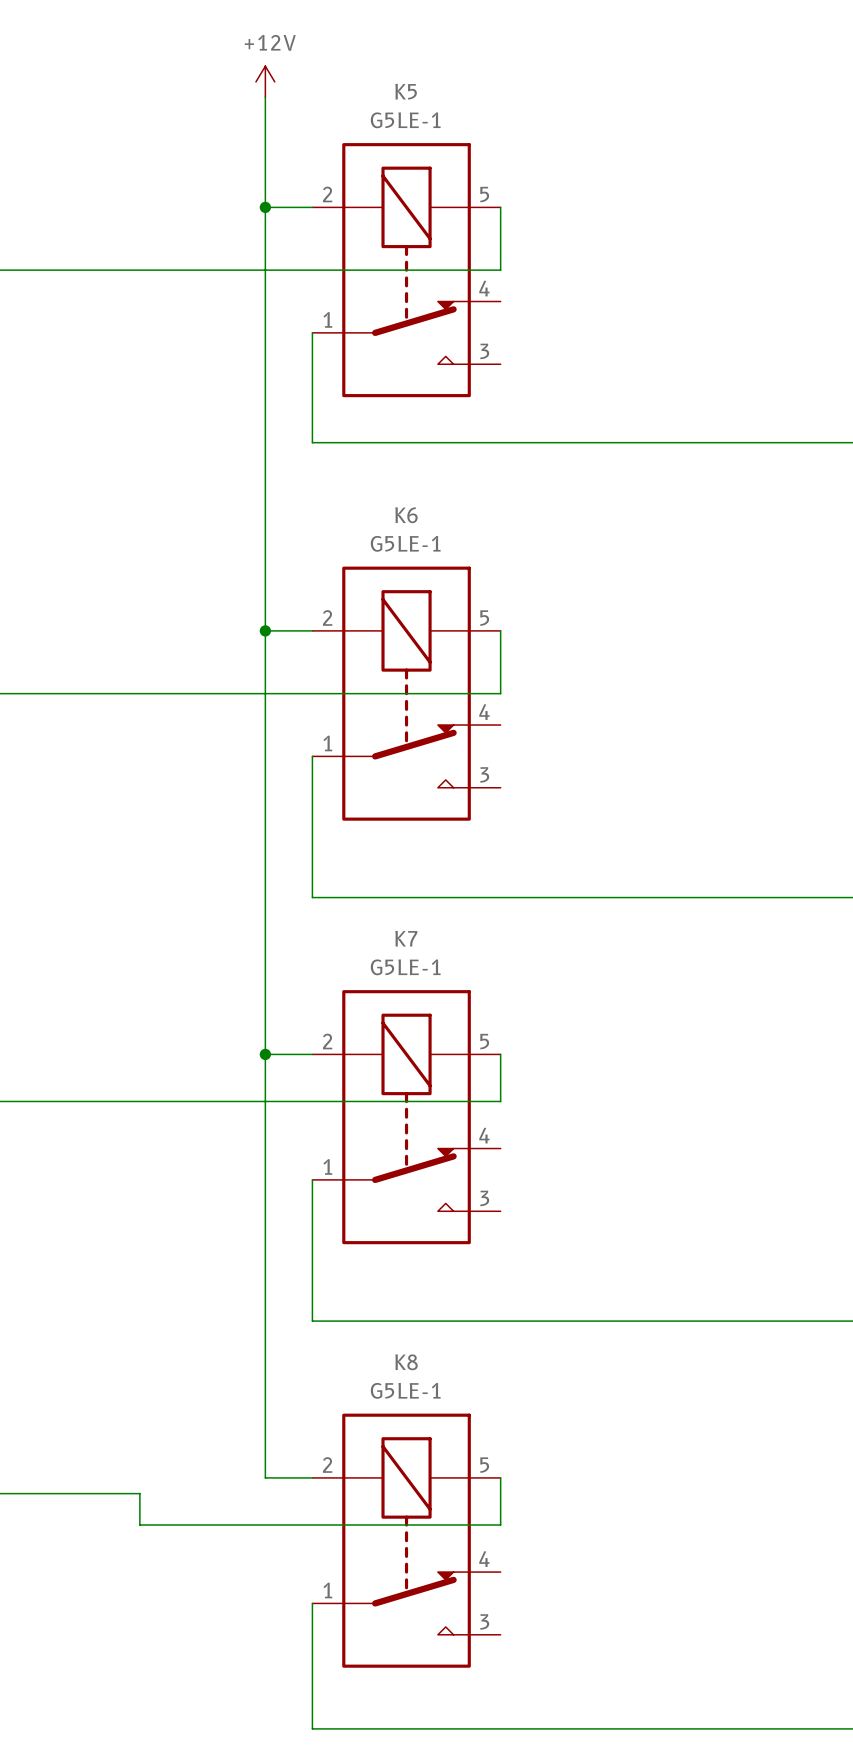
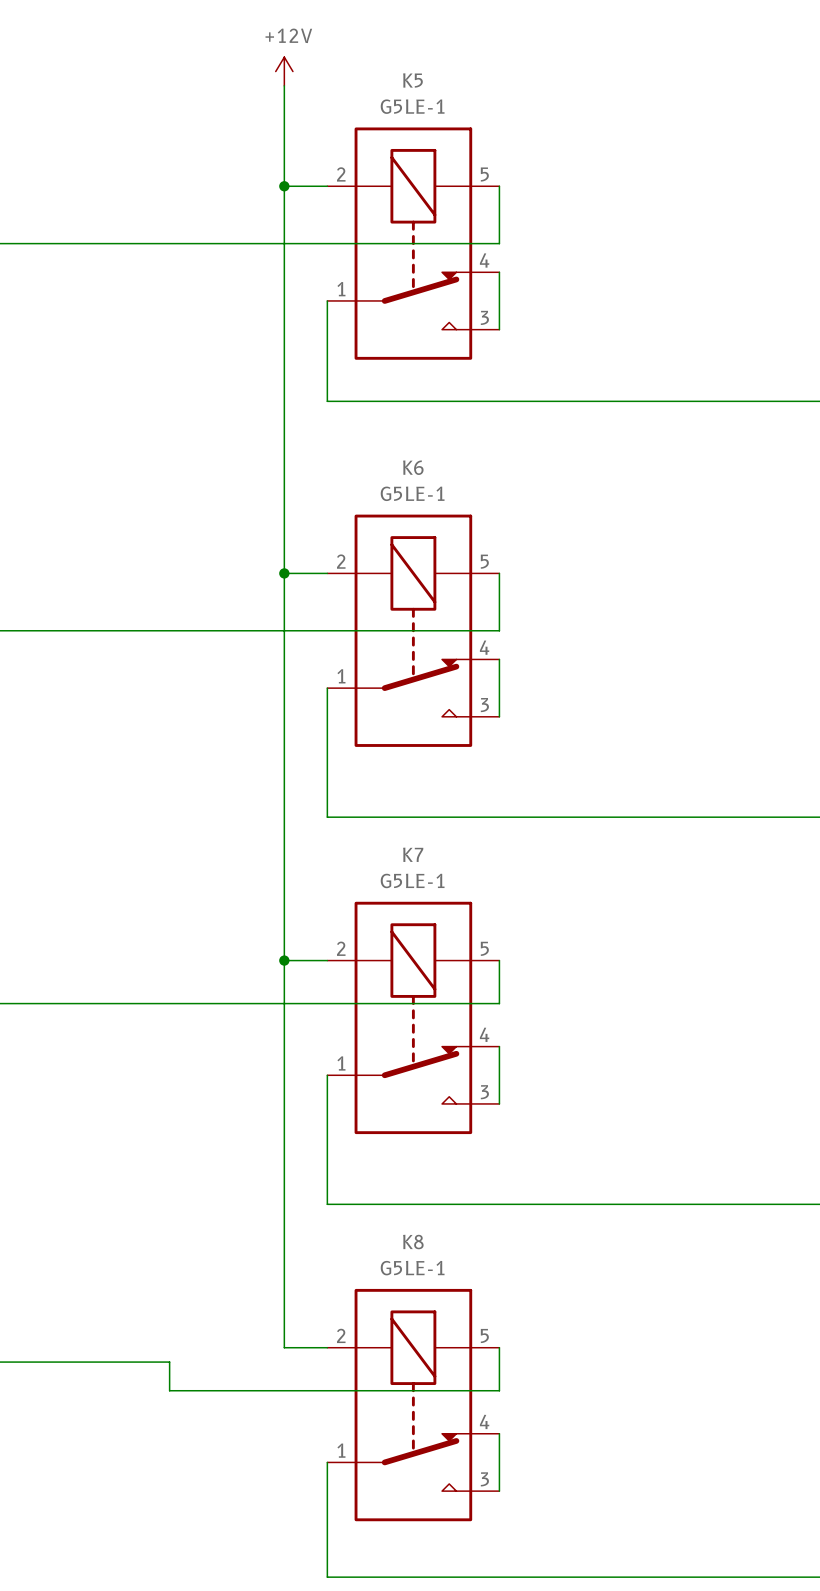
wire: none -> (499, 272) (499, 329)
wire: none -> (499, 659) (499, 716)
wire: none -> (499, 1046) (499, 1103)
wire: none -> (499, 1433) (499, 1491)

